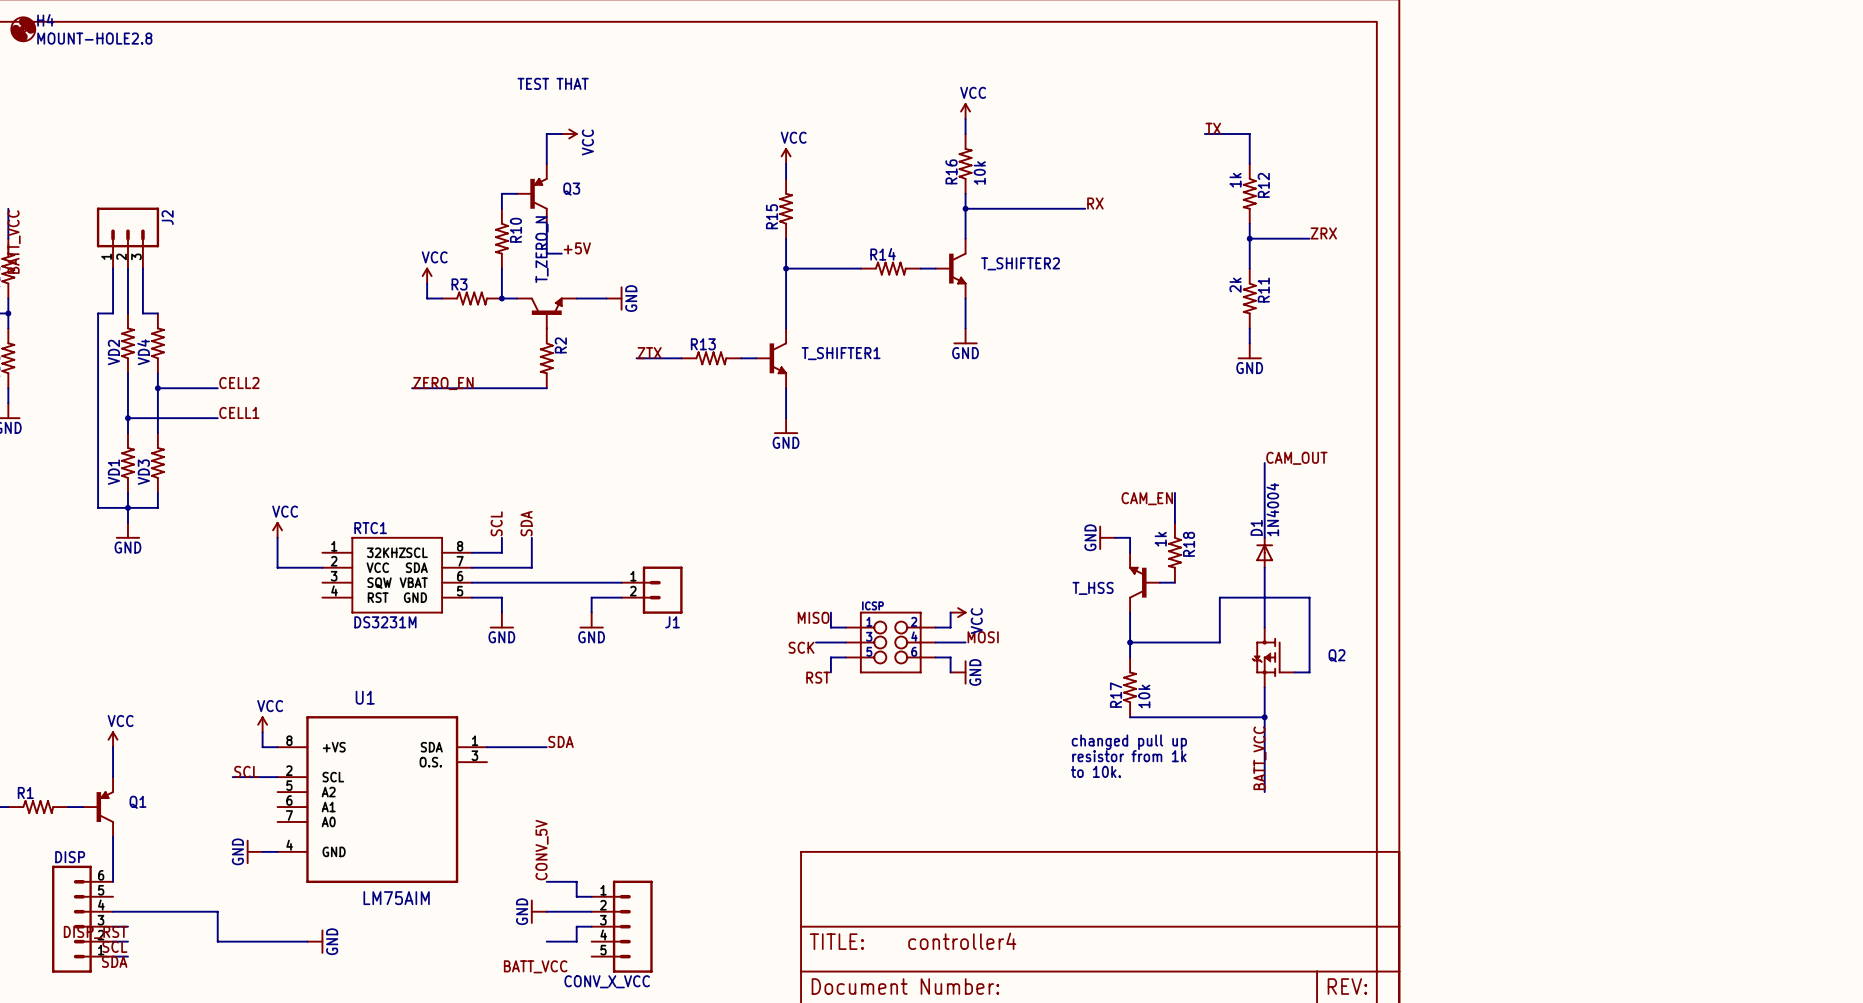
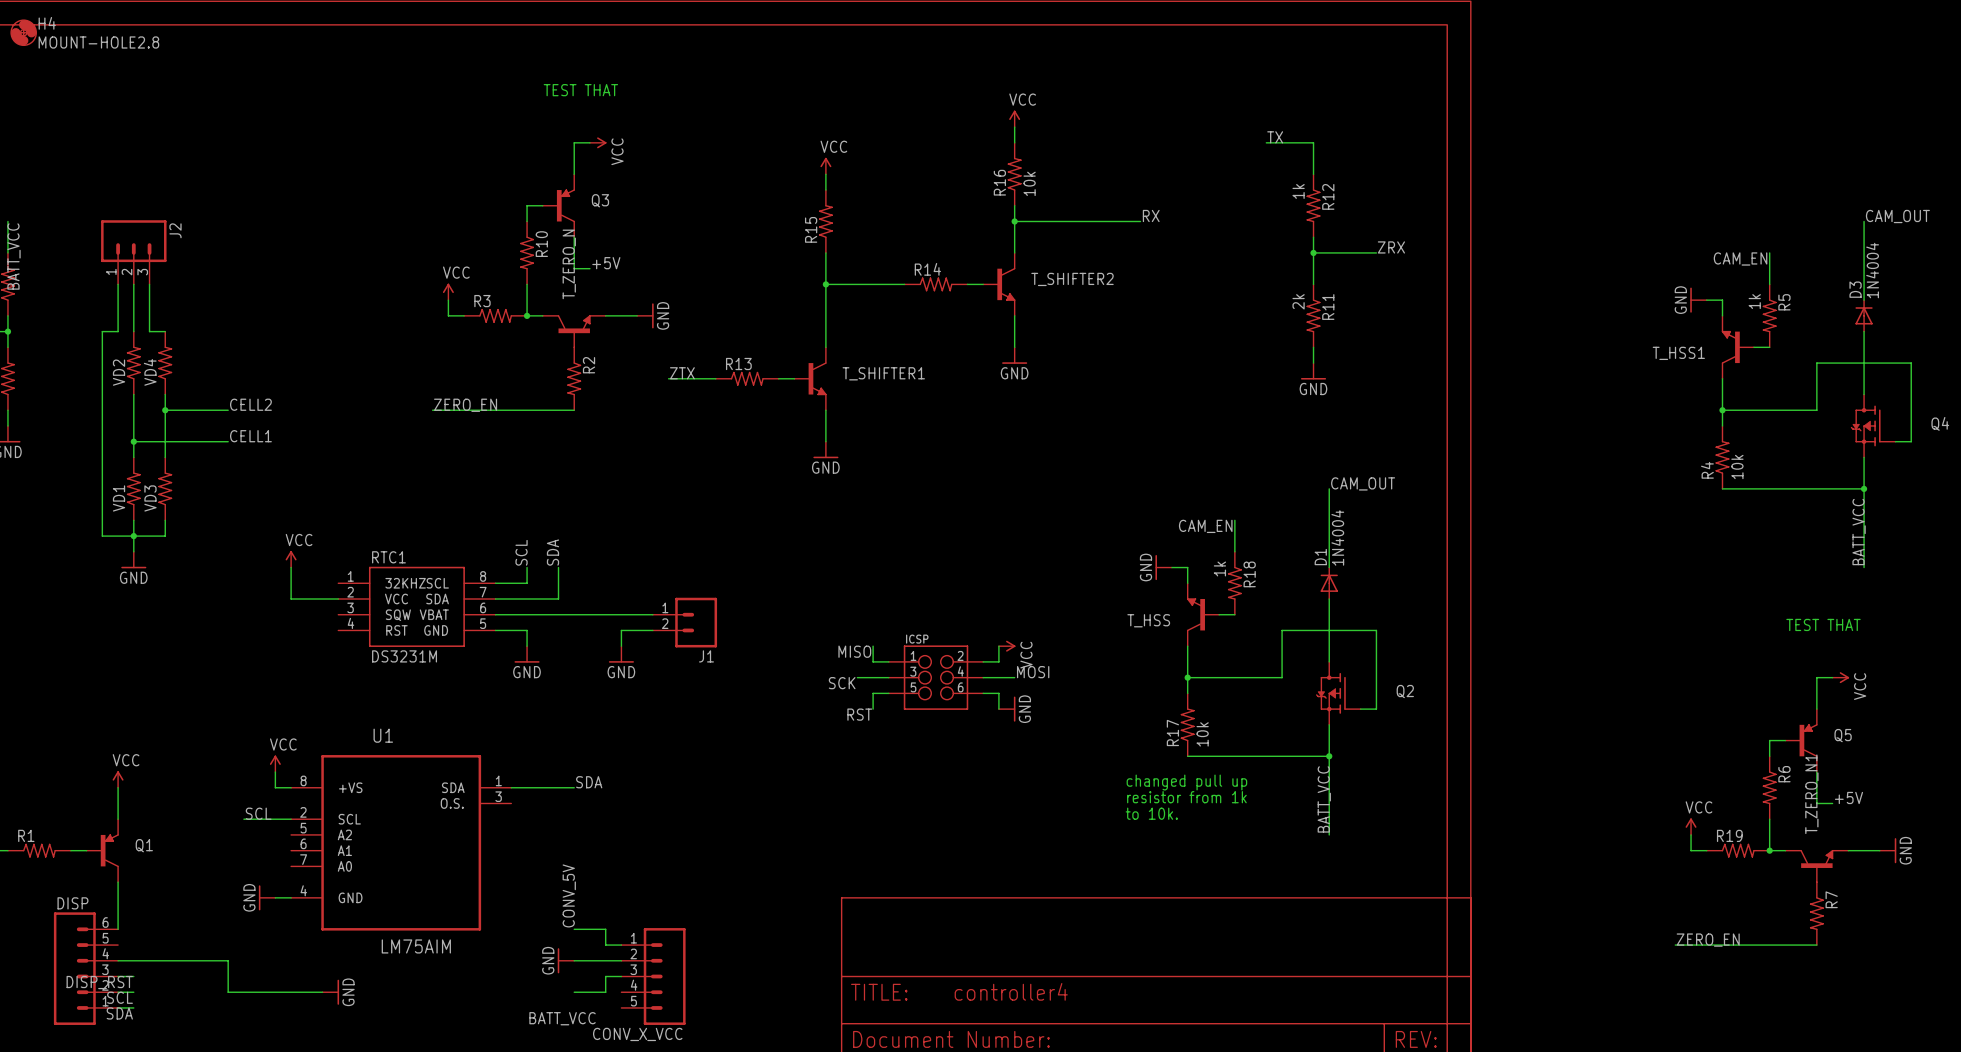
label: none -> CAM_OUT (1897, 216)
wire: none -> (1864, 221) (1864, 300)
wire: none -> (1769, 252) (1769, 284)
label: none -> CAM_EN (1740, 258)
power symbol: none -> GND (1698, 300)
wire: none -> (1706, 300) (1722, 300) (1722, 315)
R5: none -> 1k (1769, 315)
D3: none -> 1N4004 (1864, 315)
wire: none -> (1864, 331) (1864, 394)
T_HSS1: none -> (1737, 347)
wire: none -> (1753, 347) (1769, 347)
wire: none -> (1722, 378) (1722, 425)
wire: none -> (1722, 410) (1816, 410) (1816, 363) (1911, 363) (1911, 441) (1895, 441)
junction: none -> (1722, 410)
Q4: none -> (1873, 425)
R4: none -> 10k (1722, 457)
wire: none -> (1864, 457) (1864, 567)
wire: none -> (1722, 488) (1864, 488)
junction: none -> (1864, 488)
label: none -> BATT_VCC (1859, 532)
text: none -> TEST THAT (1823, 624)
wire: none -> (1832, 677) (1816, 677) (1816, 709)
power symbol: none -> VCC (1840, 677)
wire: none -> (1785, 740) (1769, 740) (1769, 756)
Q5: none -> (1801, 740)
wire: none -> (1816, 772) (1816, 803) (1832, 803)
R6: none -> (1769, 787)
label: none -> +5V (1848, 797)
wire: none -> (1769, 819) (1769, 850) (1785, 850)
power symbol: none -> VCC (1691, 826)
wire: none -> (1691, 834) (1691, 850) (1706, 850)
R19: none -> (1738, 850)
junction: none -> (1769, 850)
wire: none -> (1848, 850) (1879, 850)
power symbol: none -> GND (1888, 850)
T_ZERO_N1: none -> (1816, 866)
R7: none -> (1816, 913)
label: none -> ZERO_EN (1708, 940)
wire: none -> (1675, 945) (1816, 945)

